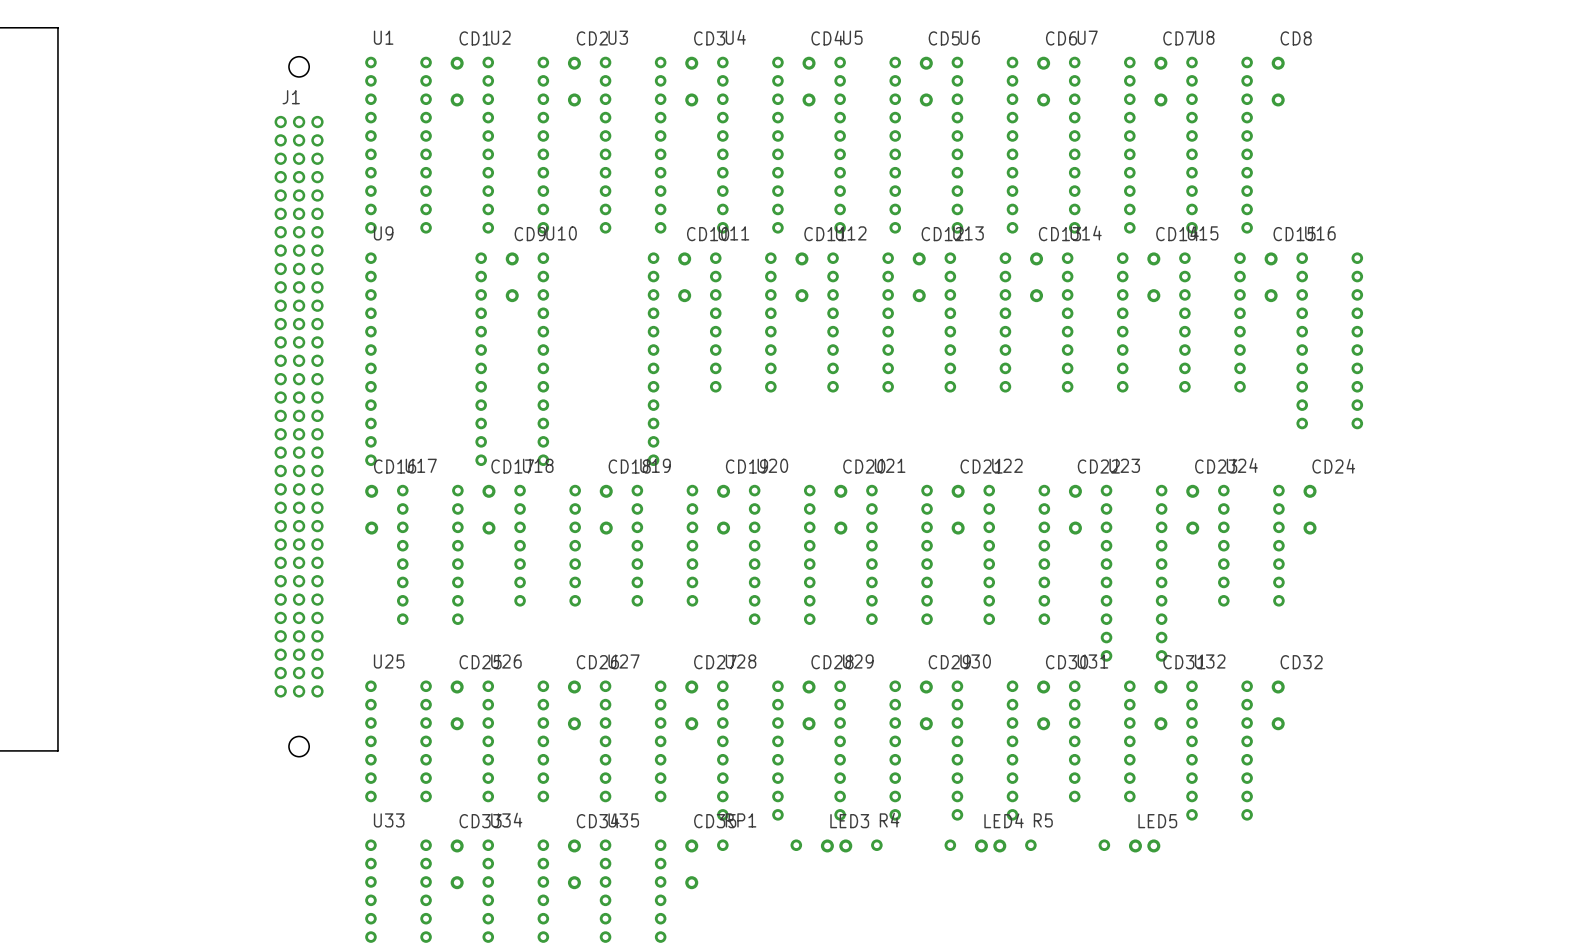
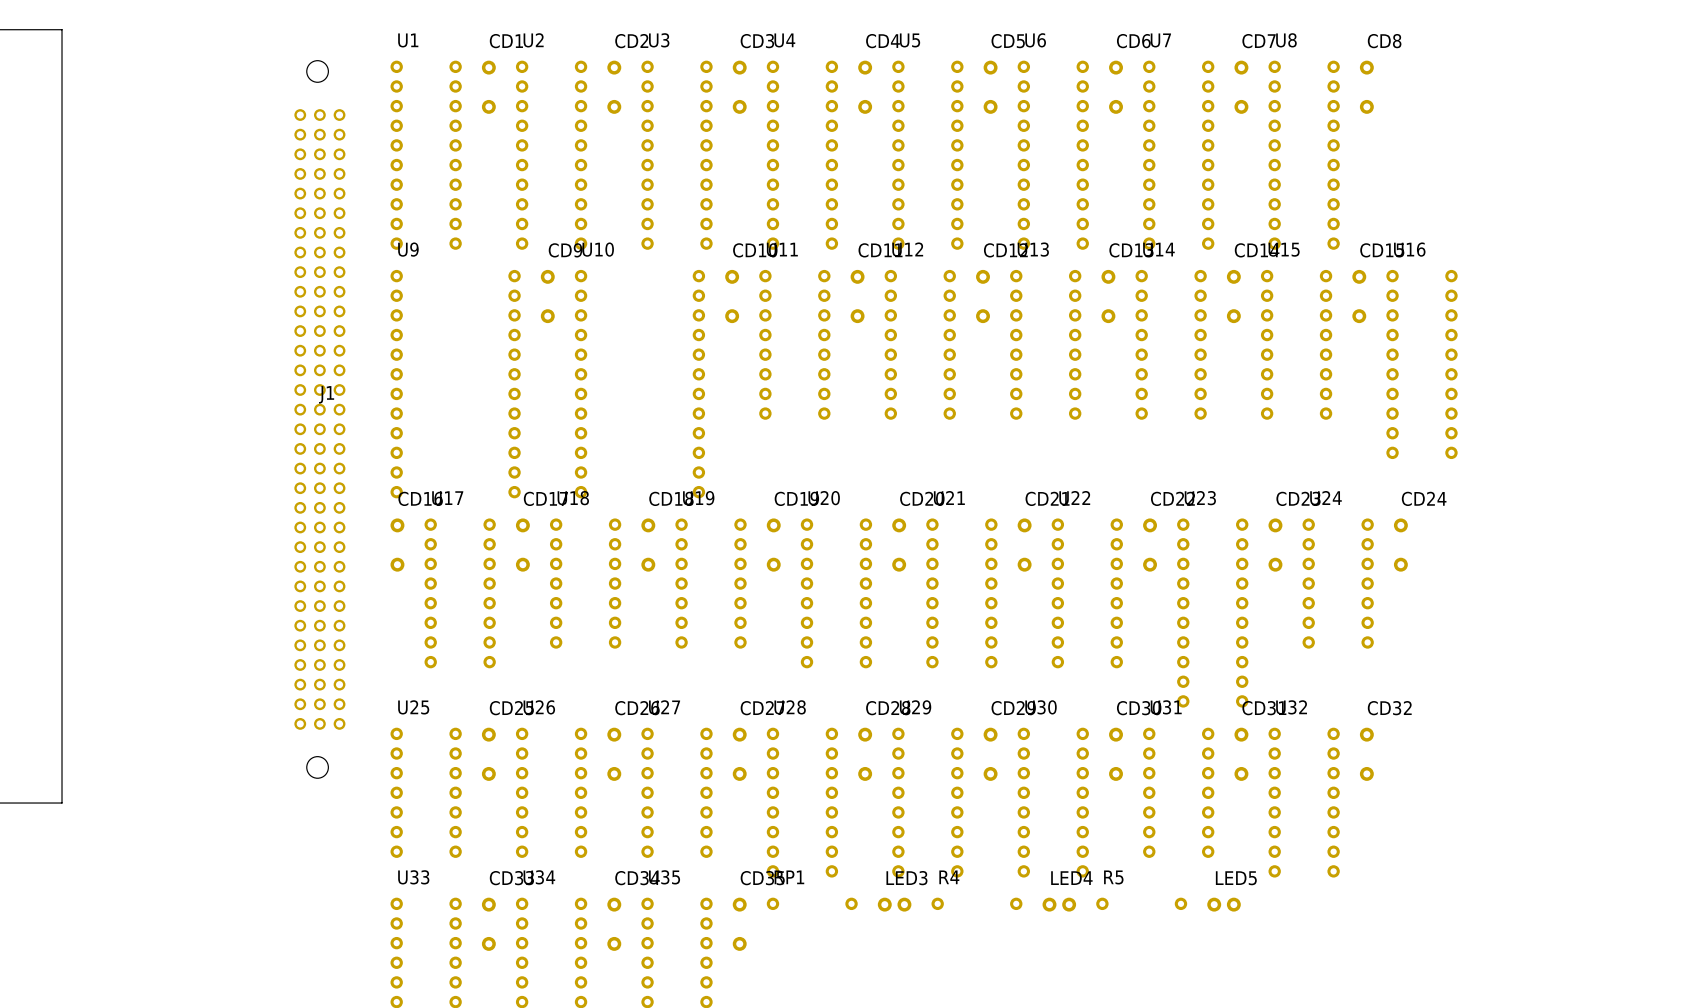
J1 footprint: [274, 56, 324, 757] -> [294, 60, 346, 779]
J1 name position: J1 (291, 97) -> J1 (326, 394)

